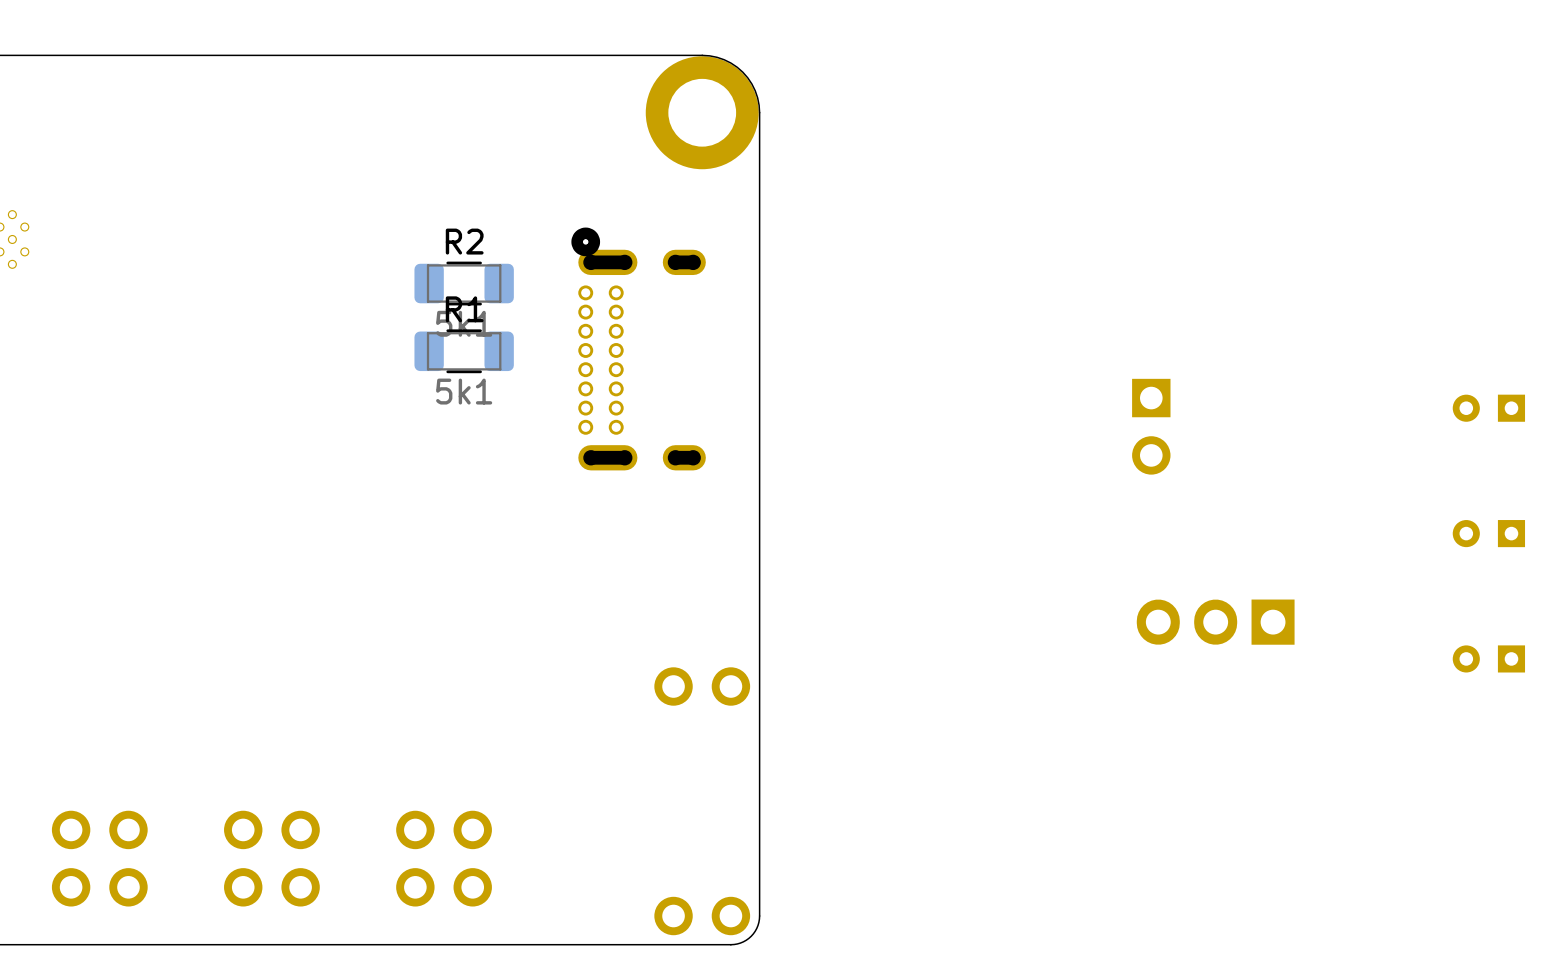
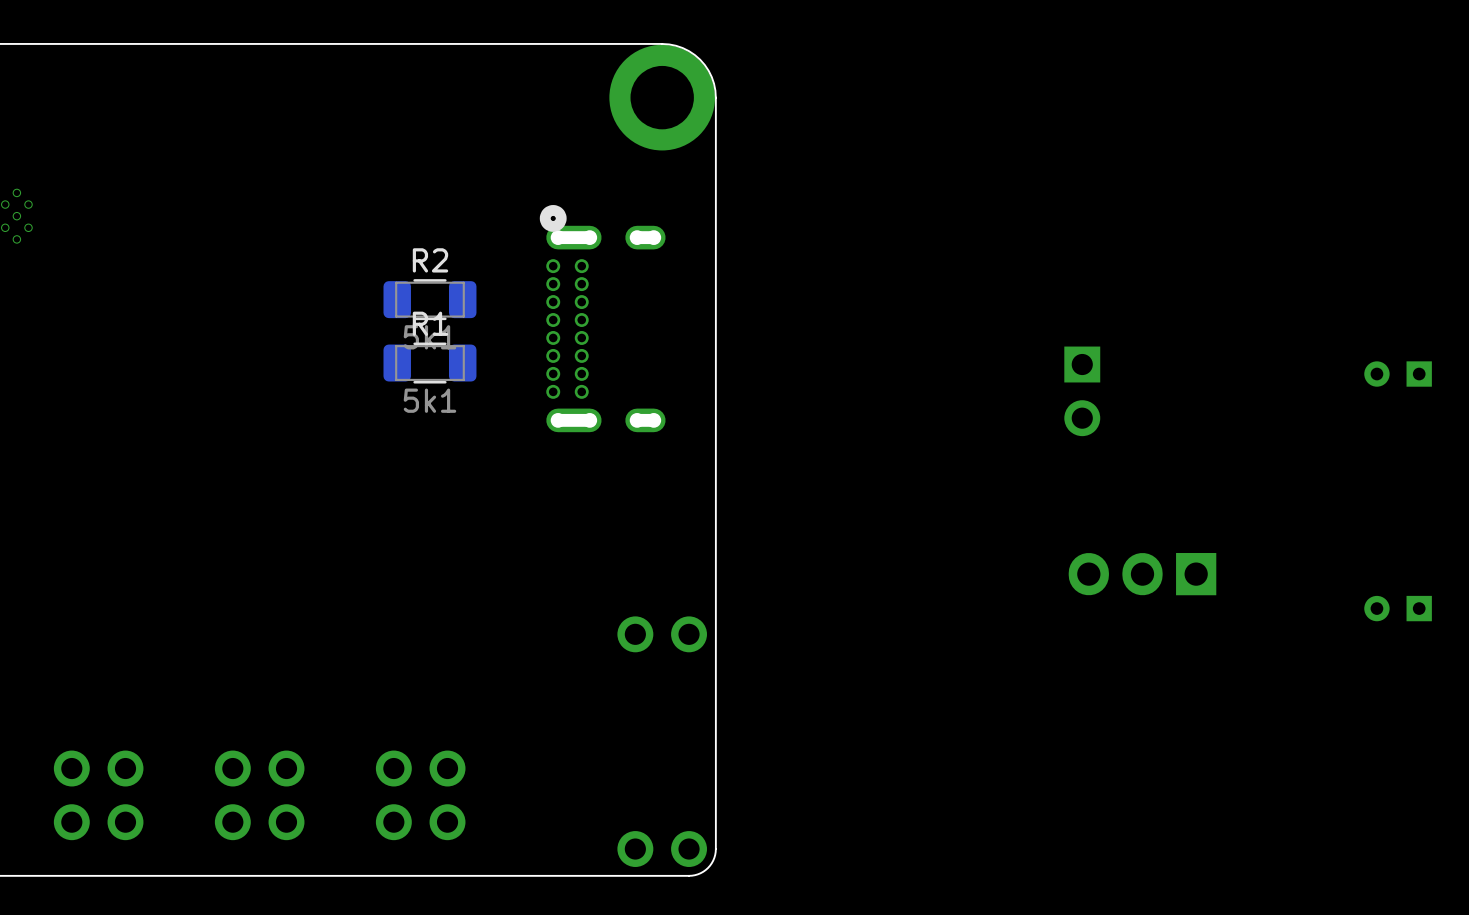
R2 position: (464, 283) -> (429, 299)
R1 position: (464, 351) -> (429, 363)
part: (1488, 533) -> none

